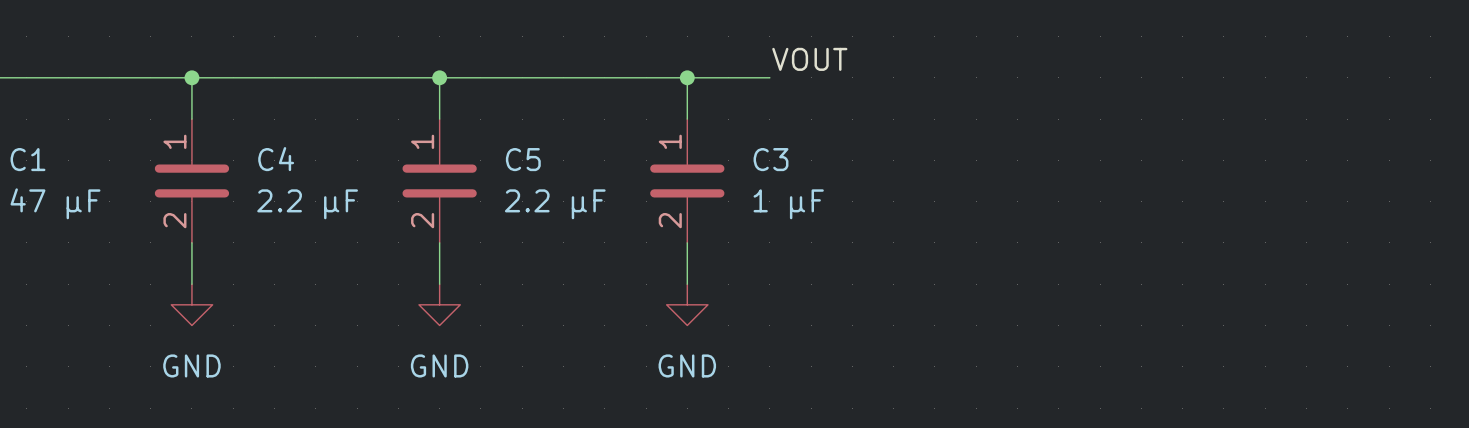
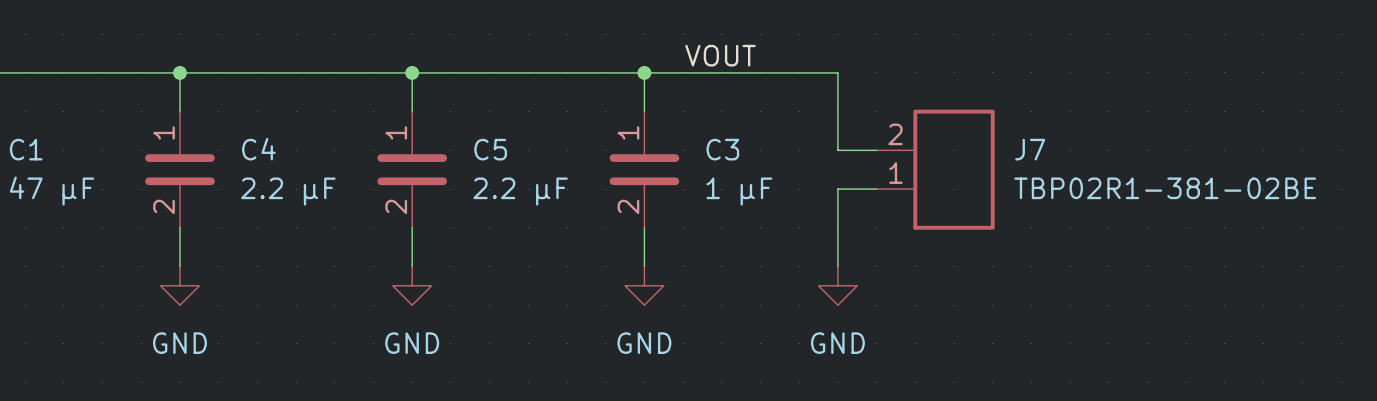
label position: VOUT (809, 59) -> VOUT (720, 55)
wire: none -> (721, 72) (837, 72) (837, 150) (876, 150)
J7: none -> TBP02R1-381-02BE (935, 169)
wire: none -> (876, 189) (837, 189) (837, 266)
power symbol: none -> GND (837, 285)

